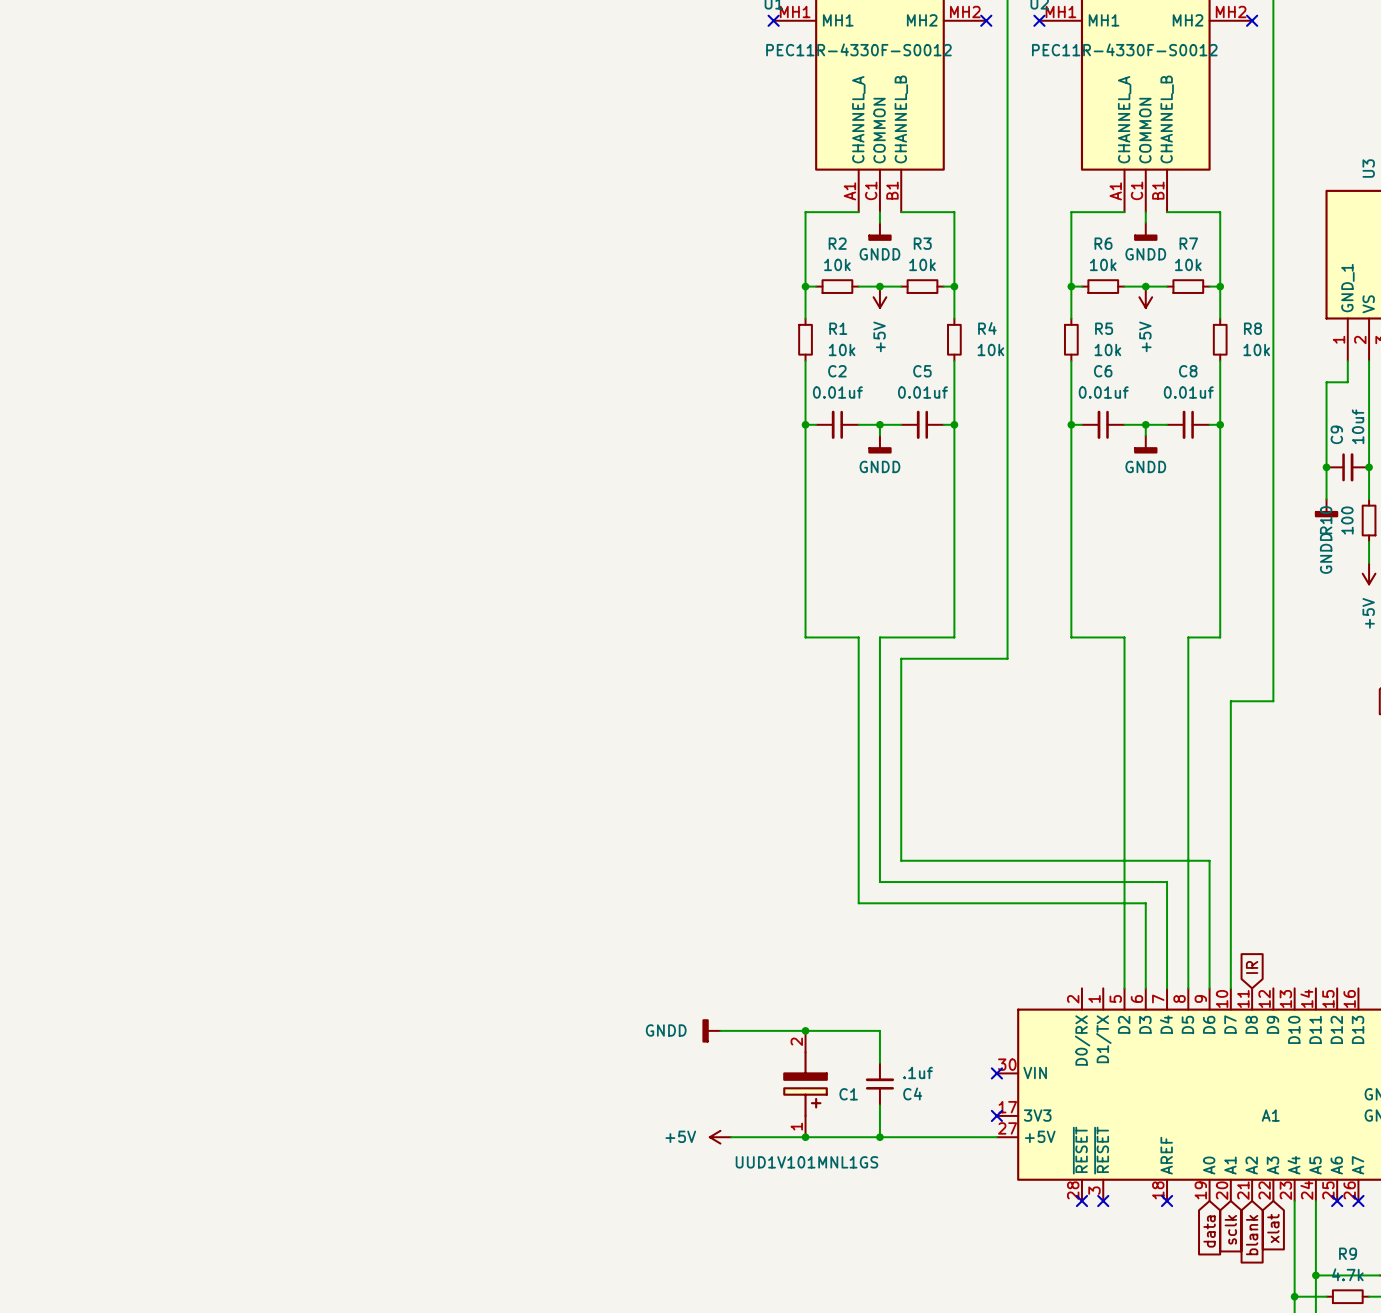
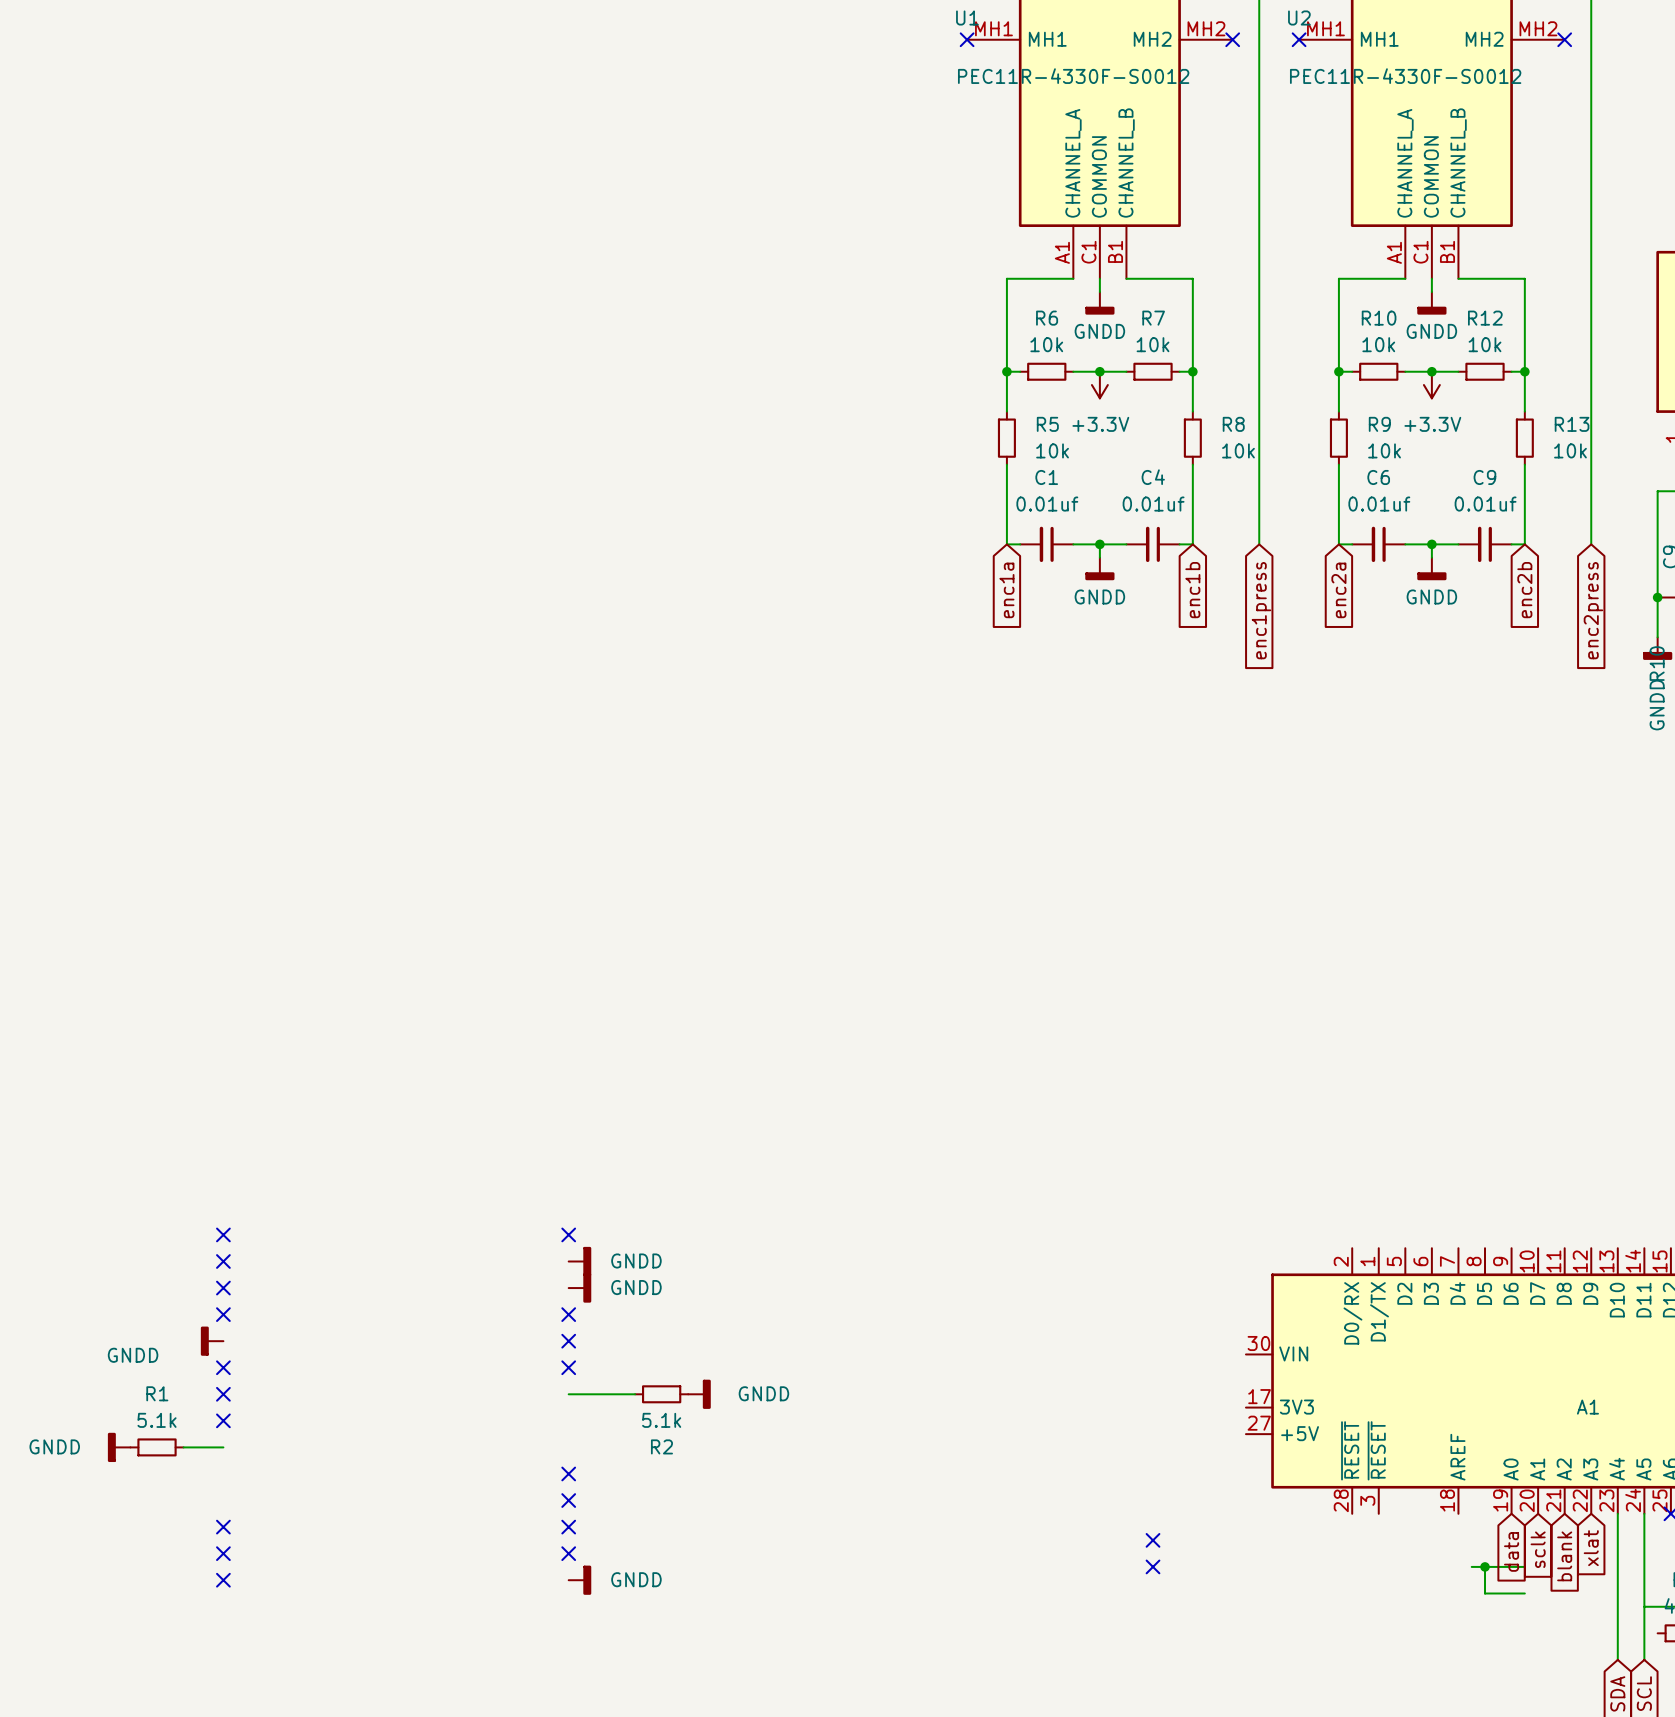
R2 name: R2 (837, 243) -> R6 (1047, 318)
R3 name: R3 (922, 243) -> R7 (1153, 318)
R6 name: R6 (1103, 243) -> R10 (1379, 318)
R7 name: R7 (1188, 243) -> R12 (1485, 318)
power symbol: +5V (879, 297) -> +3.3V (1099, 385)
power symbol: +5V (1145, 297) -> +3.3V (1431, 385)
R1 name: R1 (838, 328) -> R5 (1047, 424)
R4 name: R4 (987, 328) -> R8 (1233, 424)
R5 name: R5 (1104, 328) -> R9 (1379, 424)
R8 name: R8 (1252, 328) -> R13 (1572, 424)
C2 name: C2 (837, 371) -> C1 (1046, 477)
C5 name: C5 (922, 371) -> C4 (1153, 477)
C8 name: C8 (1188, 371) -> C9 (1484, 477)
wire: (805, 424) (805, 637) (858, 637) (858, 903) (1145, 903) (1145, 988) -> none
junction: (805, 424) -> none
wire: (954, 424) (954, 637) (879, 637) (879, 882) (1167, 882) (1167, 988) -> none
junction: (954, 424) -> none
wire: (1007, 424) (1007, 658) (901, 658) (901, 860) (1209, 860) (1209, 988) -> none
wire: (1071, 424) (1071, 637) (1124, 637) (1124, 988) -> none
junction: (1071, 424) -> none
wire: (1220, 424) (1220, 637) (1188, 637) (1188, 988) -> none
junction: (1220, 424) -> none
wire: (1273, 424) (1273, 701) (1230, 701) (1230, 988) -> none
global label: none -> enc1a (1006, 590)
global label: none -> enc1b (1192, 590)
global label: none -> enc2a (1338, 590)
global label: none -> enc2b (1524, 590)
global label: none -> enc1press (1261, 610)
global label: none -> enc2press (1593, 610)
global label: IR (1252, 967) -> none
no-connect mark: none -> (223, 1234)
no-connect mark: none -> (568, 1234)
no-connect mark: none -> (223, 1261)
power symbol: none -> GNDD (579, 1261)
no-connect mark: none -> (223, 1288)
power symbol: none -> GNDD (579, 1288)
power symbol: GNDD (711, 1030) -> none
wire: (720, 1030) (879, 1030) (879, 1062) -> none
junction: (805, 1030) -> none
no-connect mark: none -> (223, 1314)
no-connect mark: none -> (568, 1314)
power symbol: none -> GNDD (212, 1341)
no-connect mark: none -> (568, 1341)
no-connect mark: (996, 1073) -> none
no-connect mark: none -> (223, 1367)
no-connect mark: none -> (568, 1367)
C1: UUD1V101MNL1GS (805, 1084) -> none
C4: .1uf (879, 1084) -> none
no-connect mark: none -> (223, 1394)
wire: none -> (568, 1394) (635, 1394)
R2: none -> 5.1k (661, 1394)
power symbol: none -> GNDD (699, 1394)
wire: (879, 1105) (879, 1137) -> none
no-connect mark: (996, 1115) -> none
no-connect mark: none -> (223, 1420)
power symbol: +5V (720, 1137) -> none
wire: (731, 1137) (996, 1137) -> none
junction: (805, 1137) -> none
junction: (879, 1137) -> none
power symbol: none -> GNDD (119, 1447)
R1: none -> 5.1k (157, 1447)
wire: none -> (183, 1447) (223, 1447)
no-connect mark: none -> (568, 1473)
no-connect mark: none -> (568, 1500)
no-connect mark: (1081, 1201) -> none
no-connect mark: (1103, 1201) -> none
no-connect mark: (1167, 1201) -> none
no-connect mark: none -> (223, 1527)
no-connect mark: none -> (568, 1527)
no-connect mark: none -> (1153, 1540)
no-connect mark: none -> (223, 1553)
no-connect mark: none -> (568, 1553)
no-connect mark: none -> (1153, 1566)
wire: none -> (1471, 1566) (1524, 1566)
wire: none -> (1485, 1566) (1485, 1593) (1524, 1593)
junction: none -> (1485, 1566)
no-connect mark: none -> (223, 1580)
power symbol: none -> GNDD (579, 1580)
junction: (1315, 1275) -> none
wire: (1294, 1296) (1326, 1296) -> none
junction: (1294, 1296) -> none

